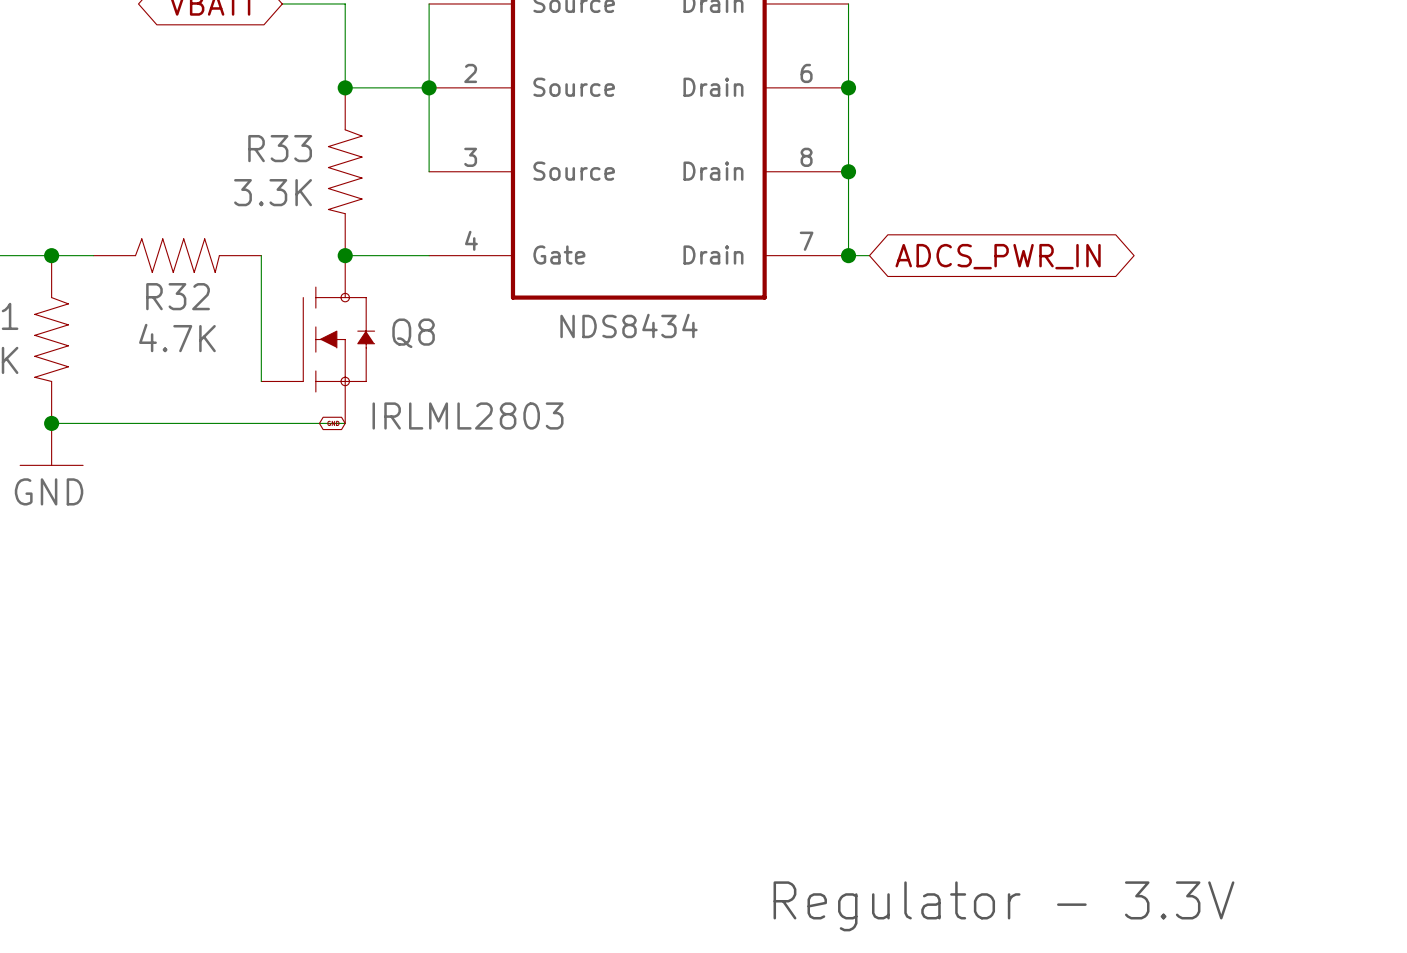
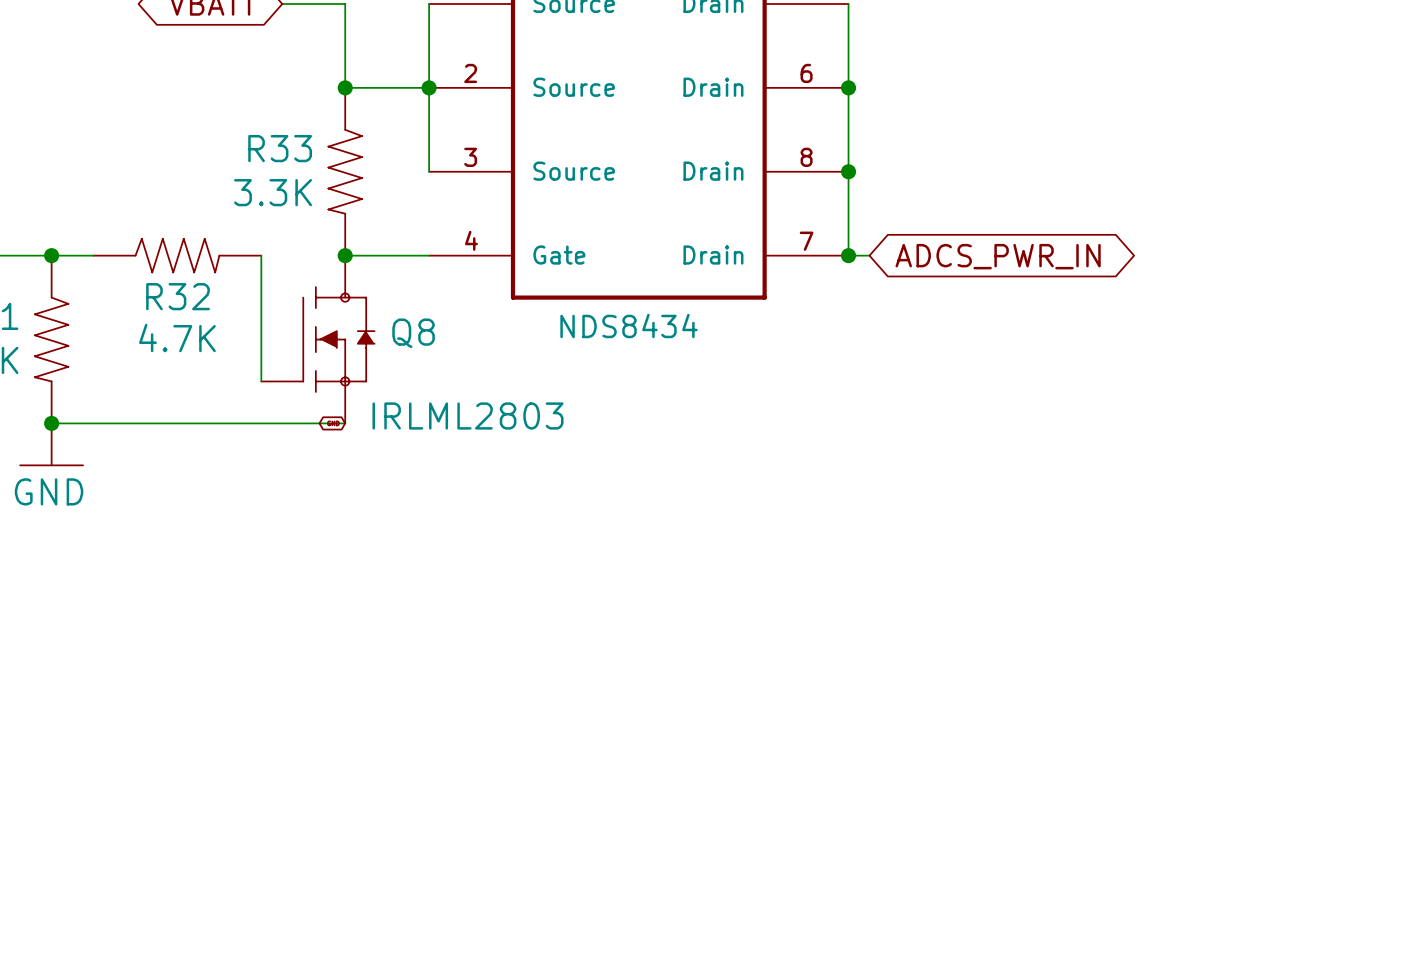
text: Regulator - 3.3V (1003, 906) -> none

